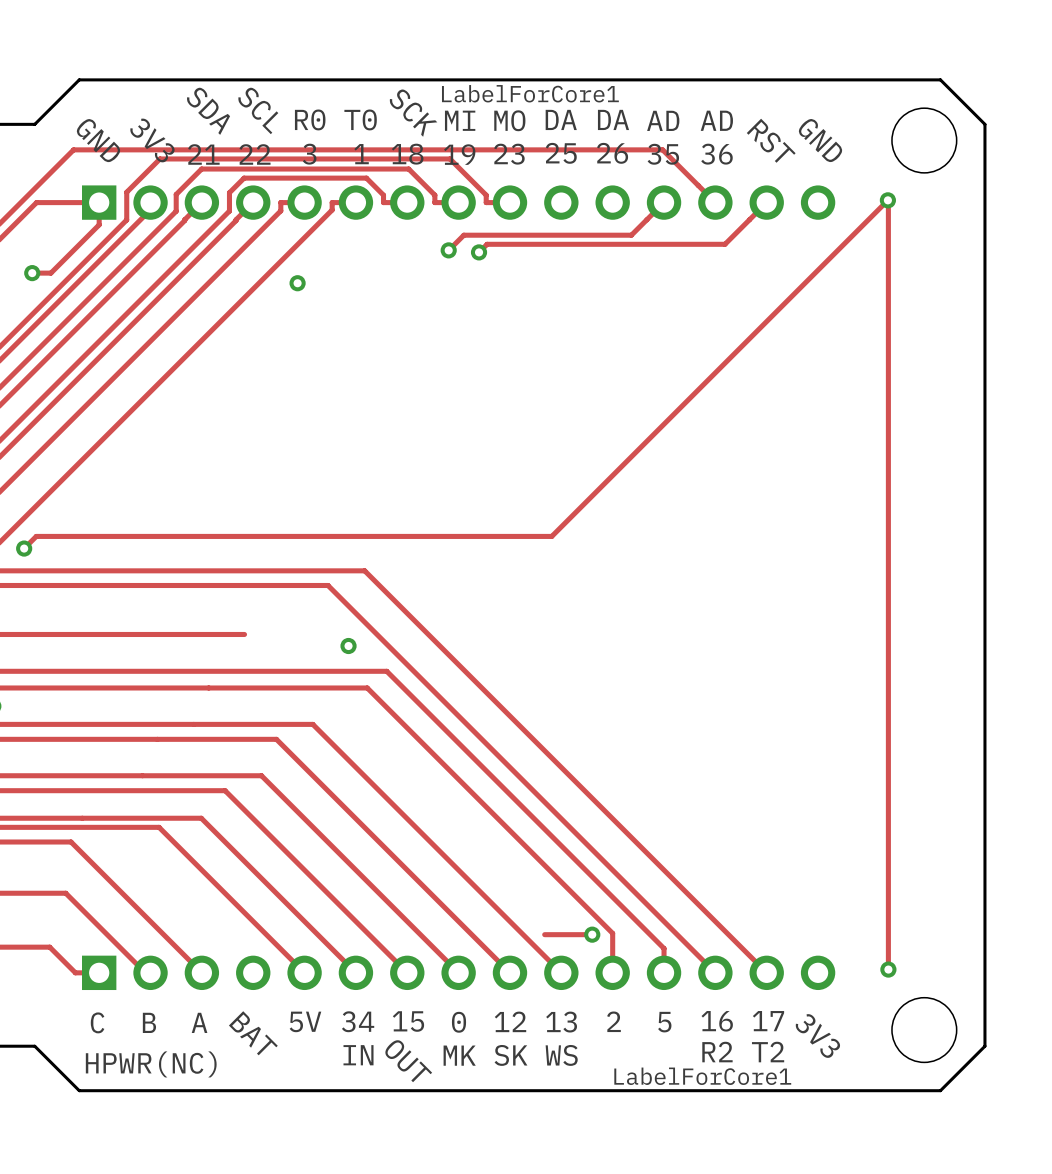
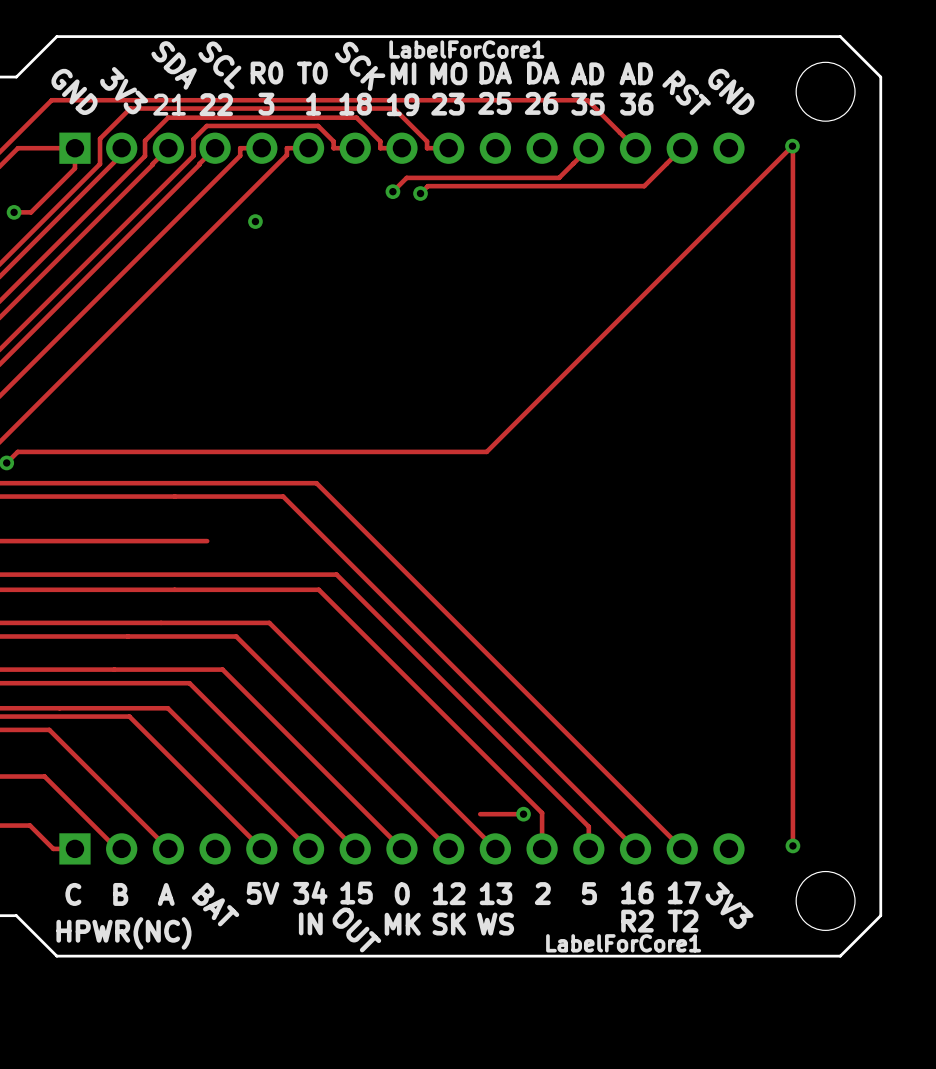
via: (348, 646) -> none

